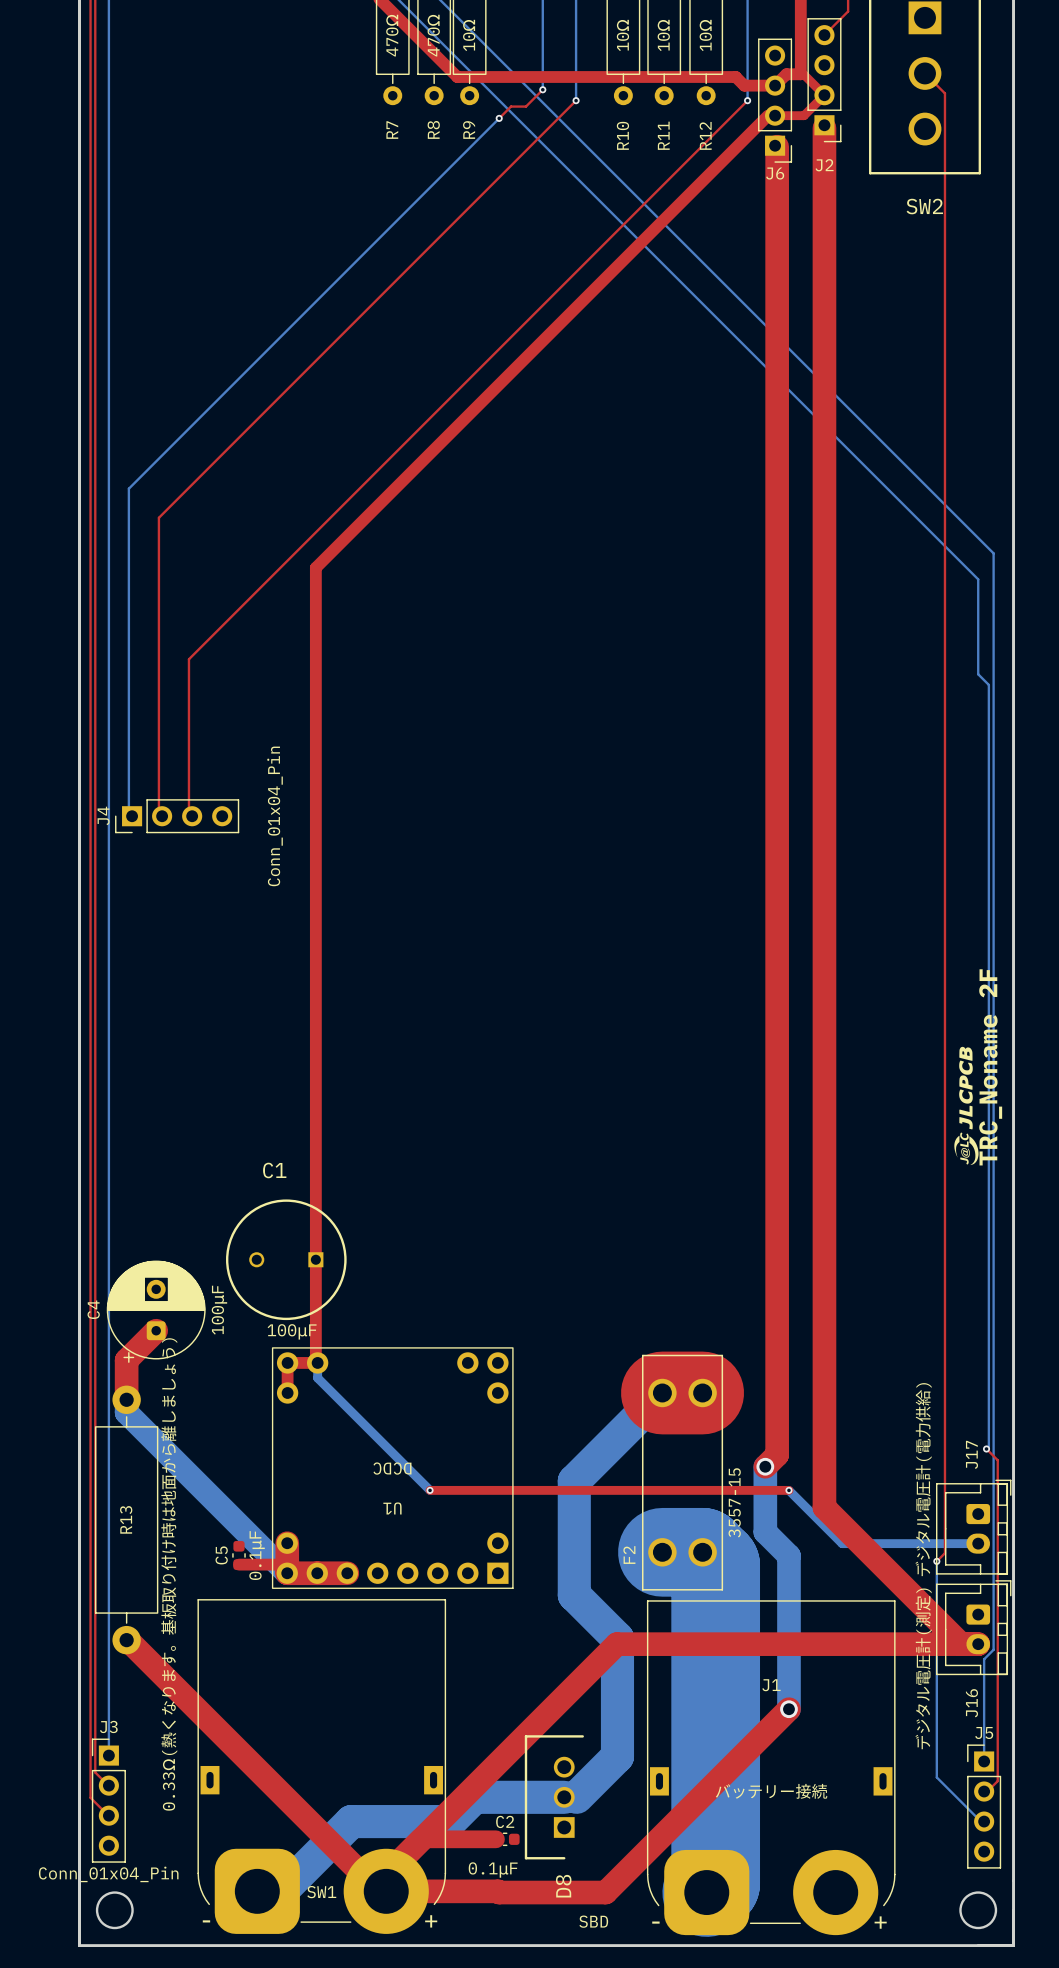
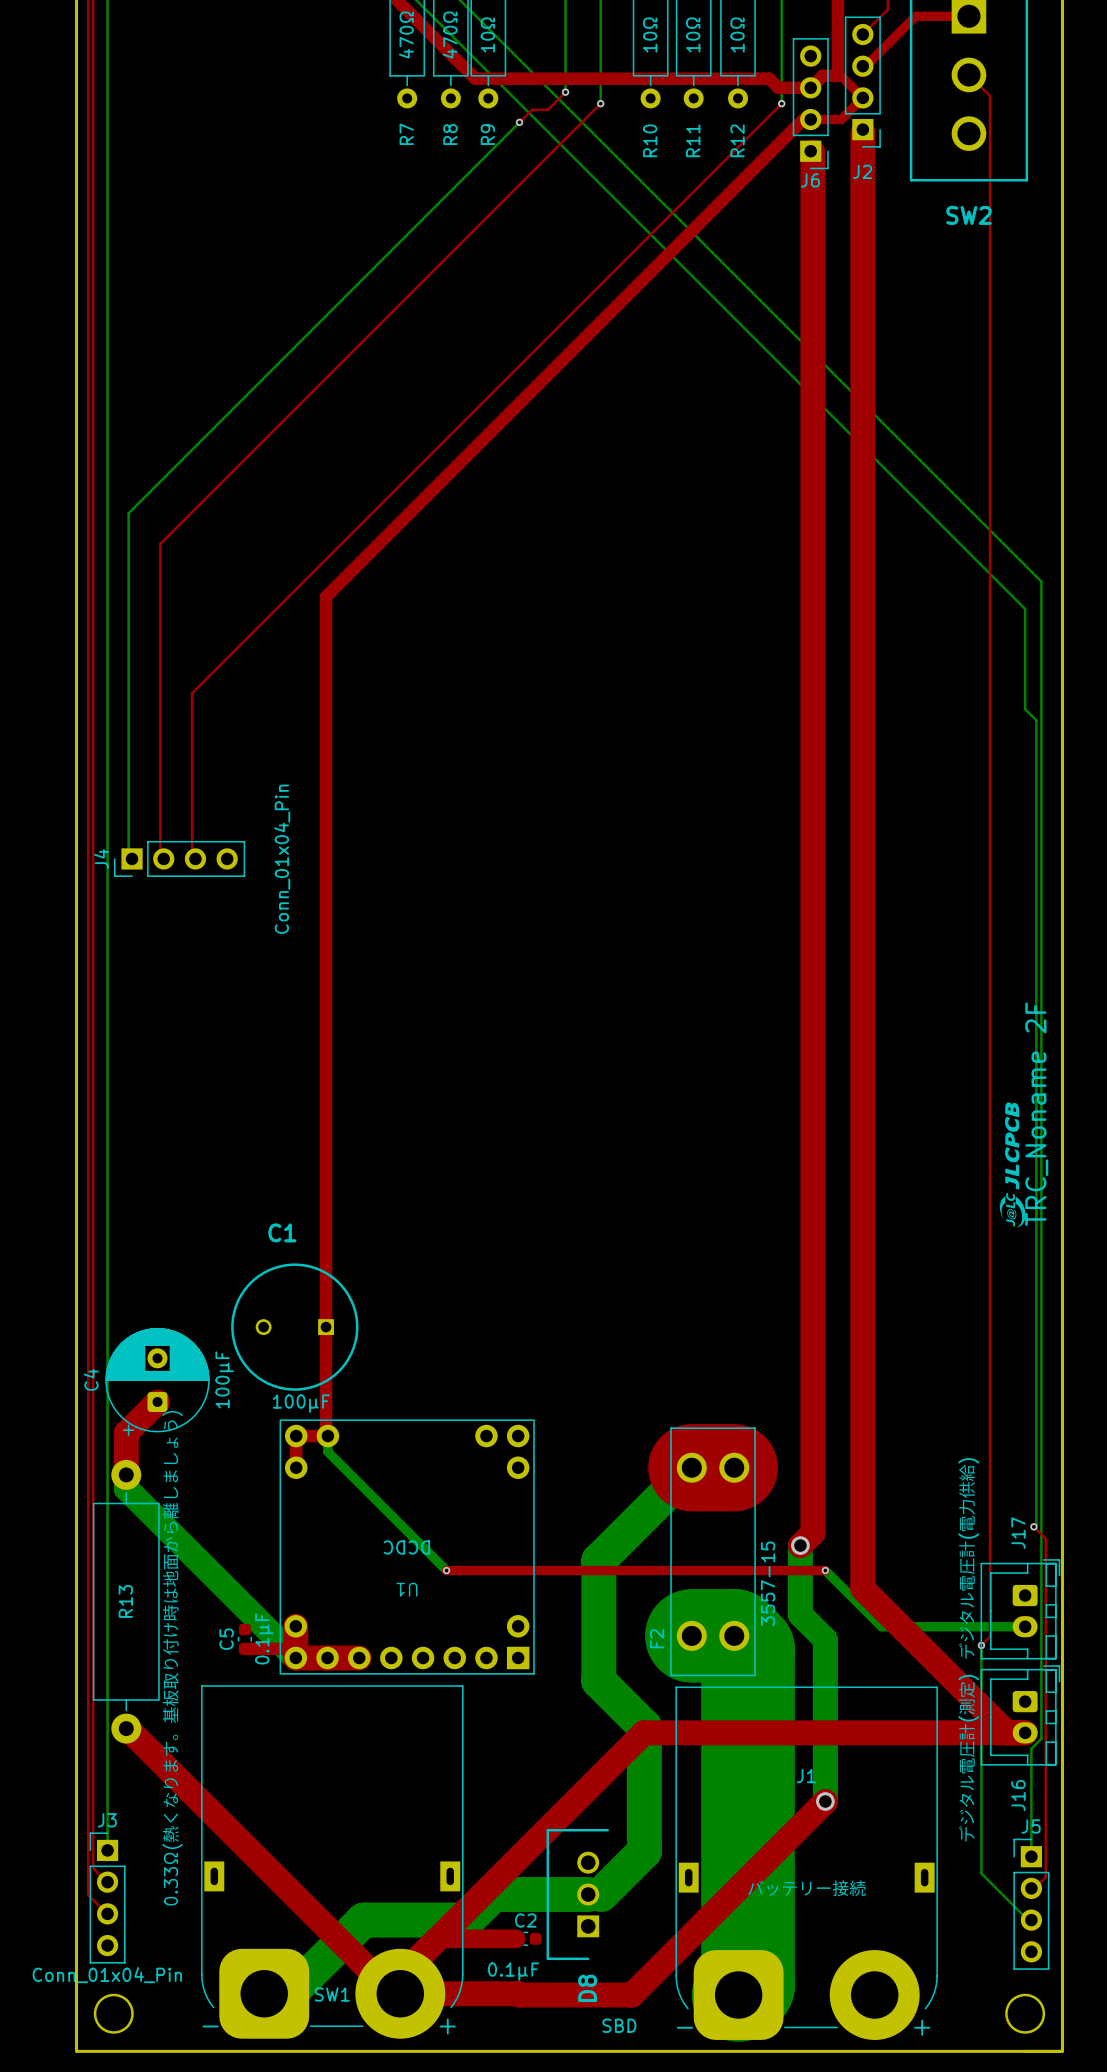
top track: none -> (968, 16) (915, 16) (862, 69)

